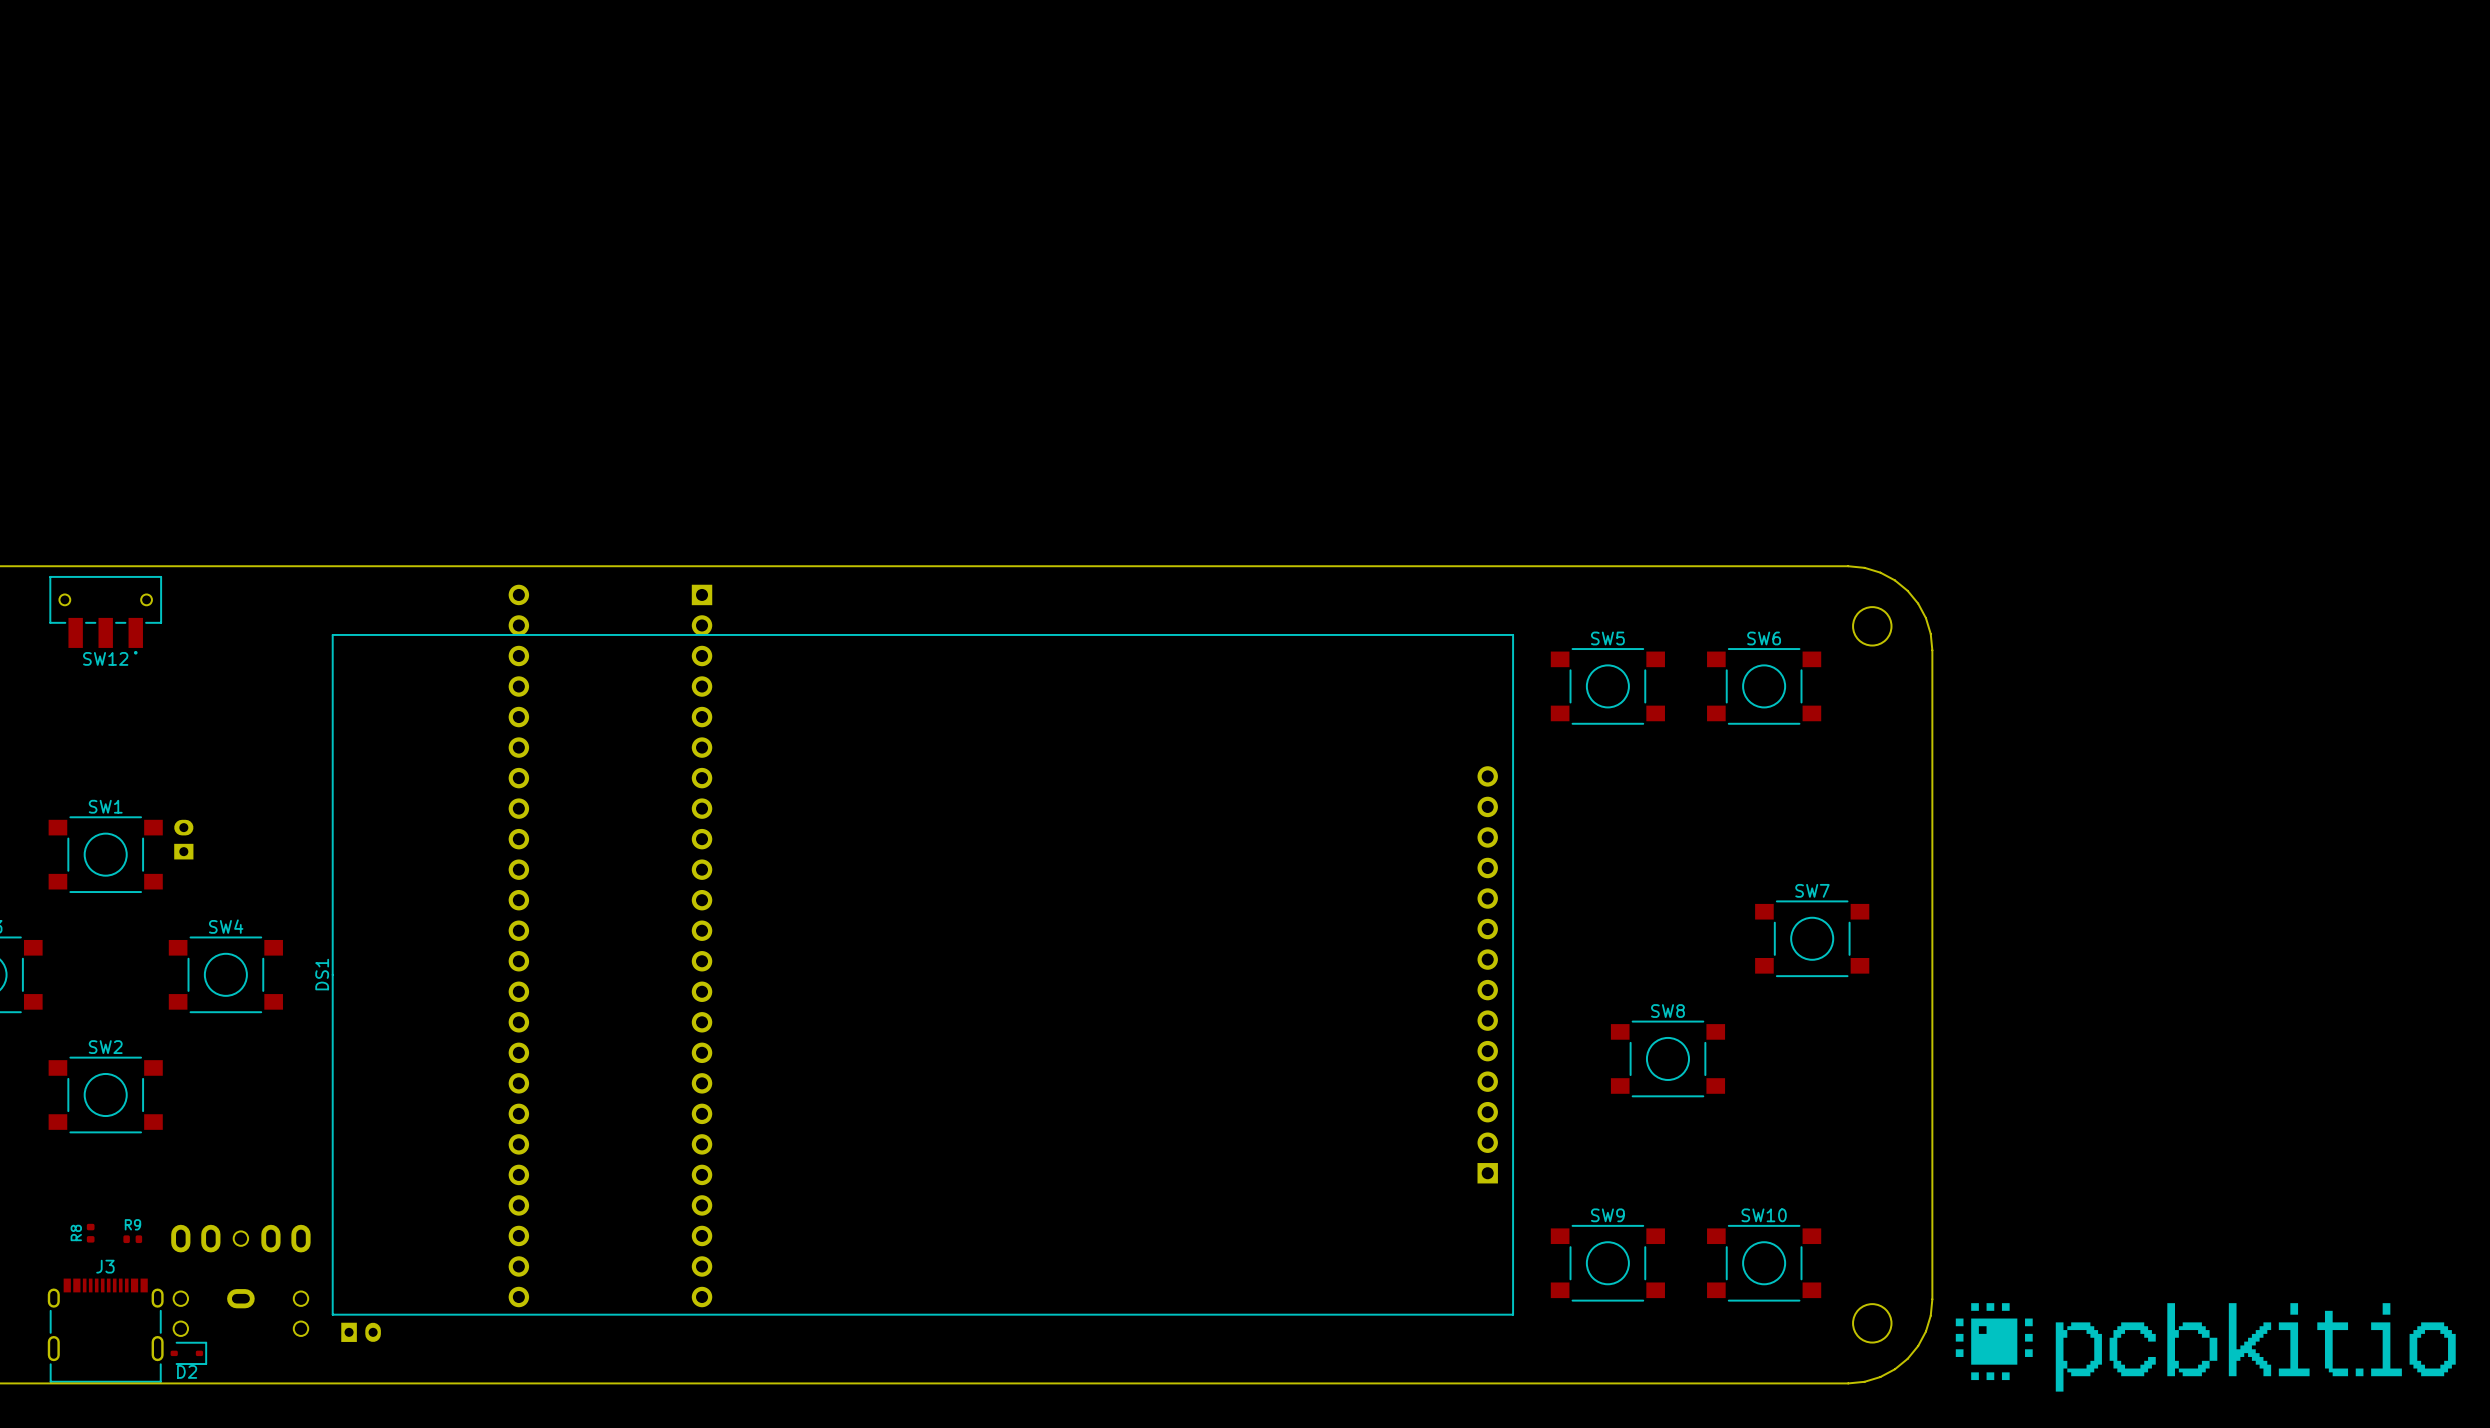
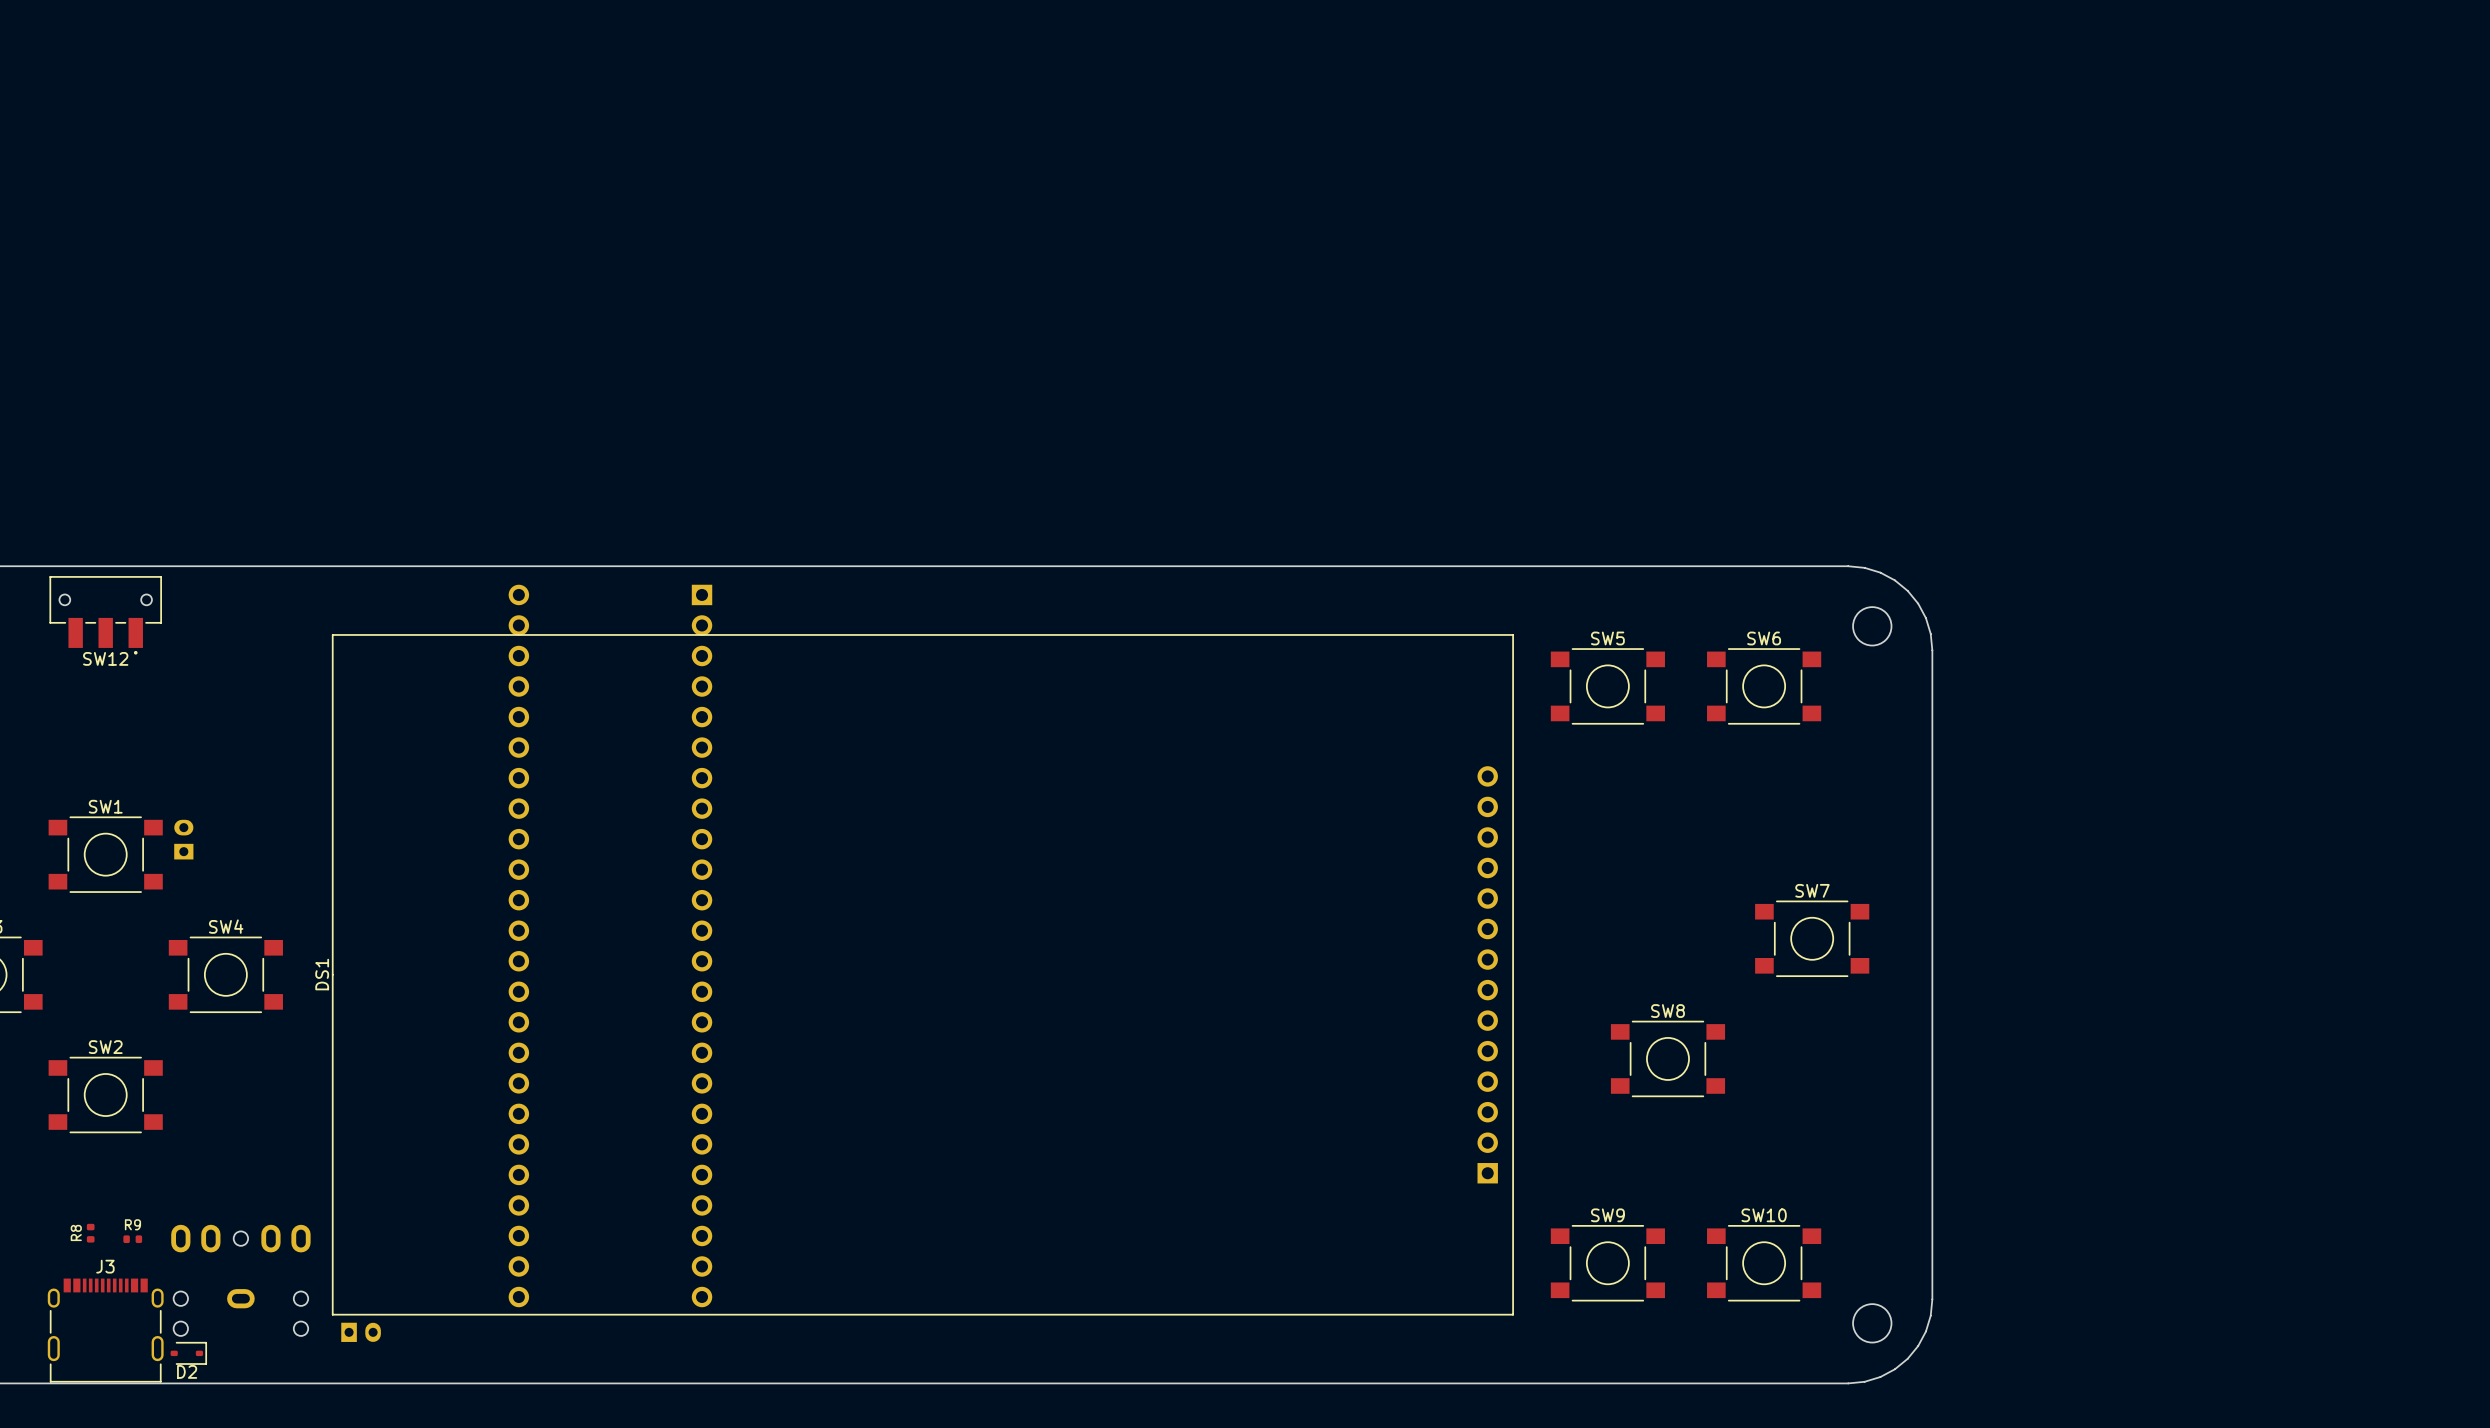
drawing: [1955, 1303, 2456, 1392] -> none

